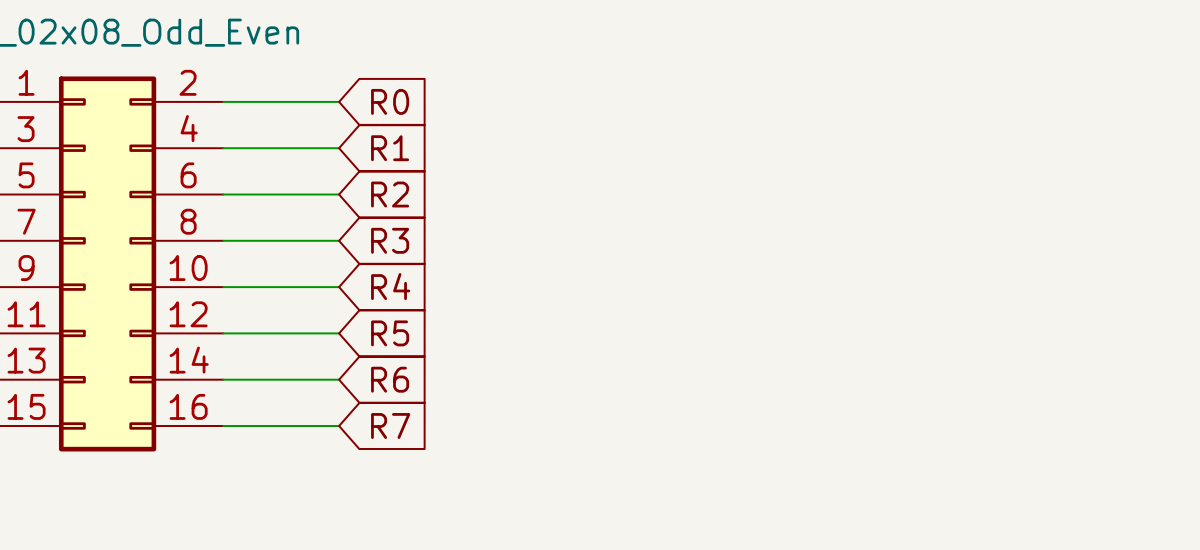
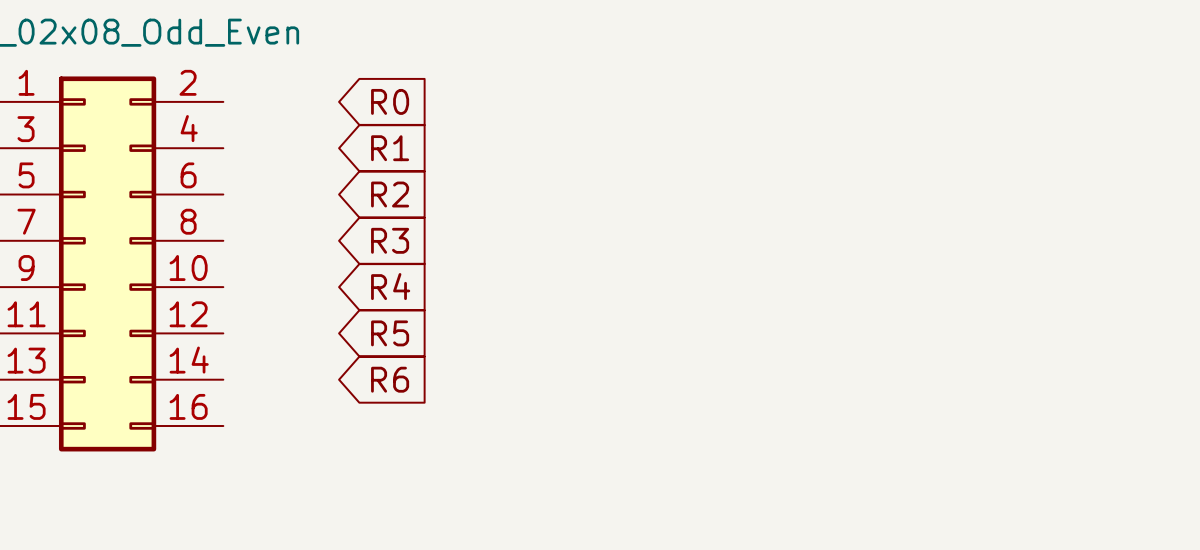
wire: (223, 101) (339, 101) -> none
wire: (223, 148) (339, 148) -> none
wire: (223, 194) (339, 194) -> none
wire: (223, 240) (339, 240) -> none
wire: (223, 287) (339, 287) -> none
wire: (223, 333) (339, 333) -> none
wire: (223, 379) (339, 379) -> none
wire: (223, 426) (339, 426) -> none
global label: R7 (390, 426) -> none

